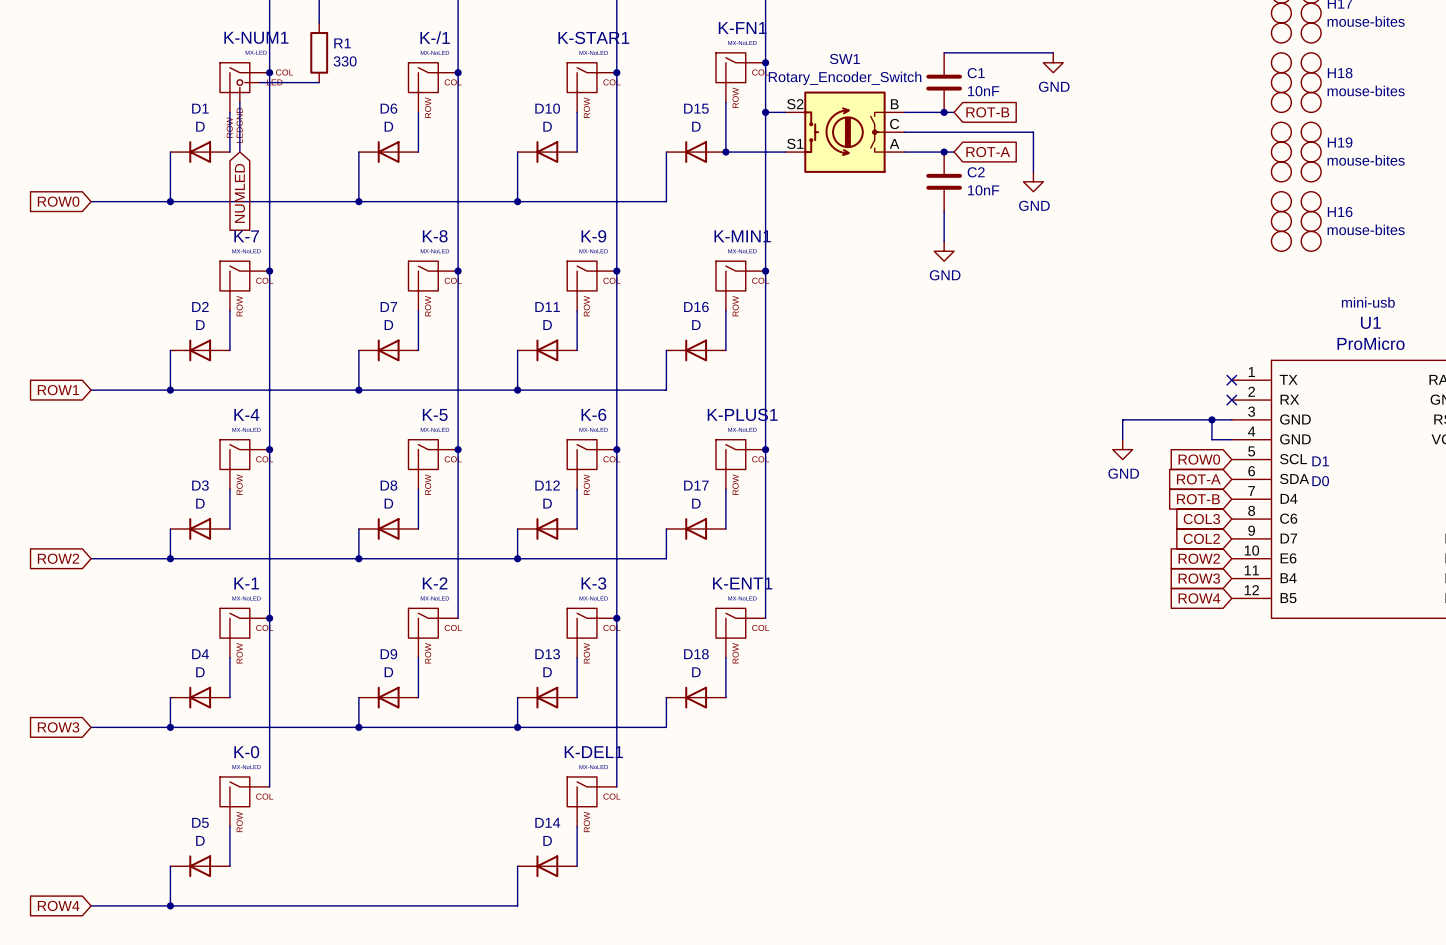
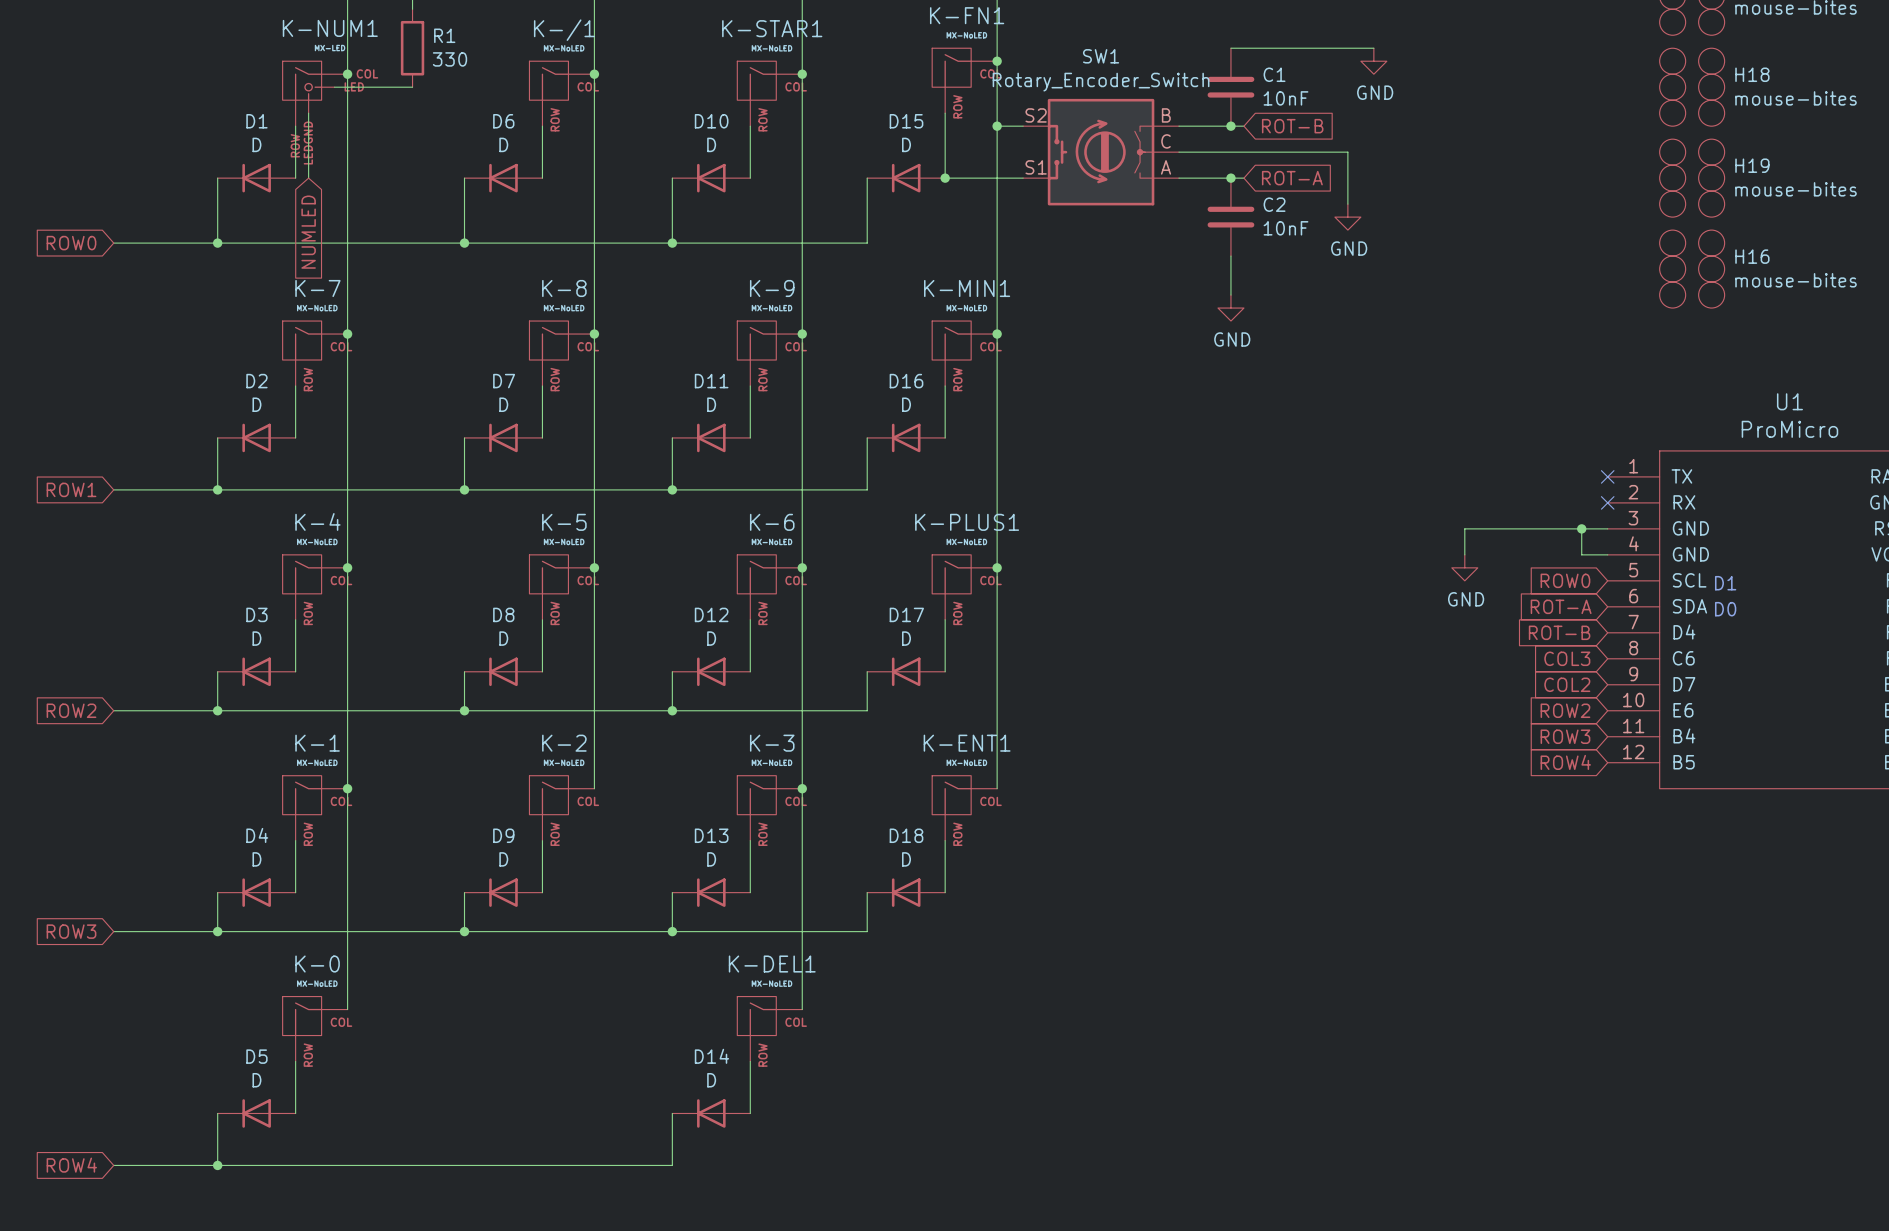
text: mini-usb (1368, 302) -> none

